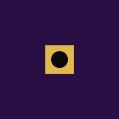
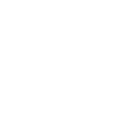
part: (59, 59) -> none

